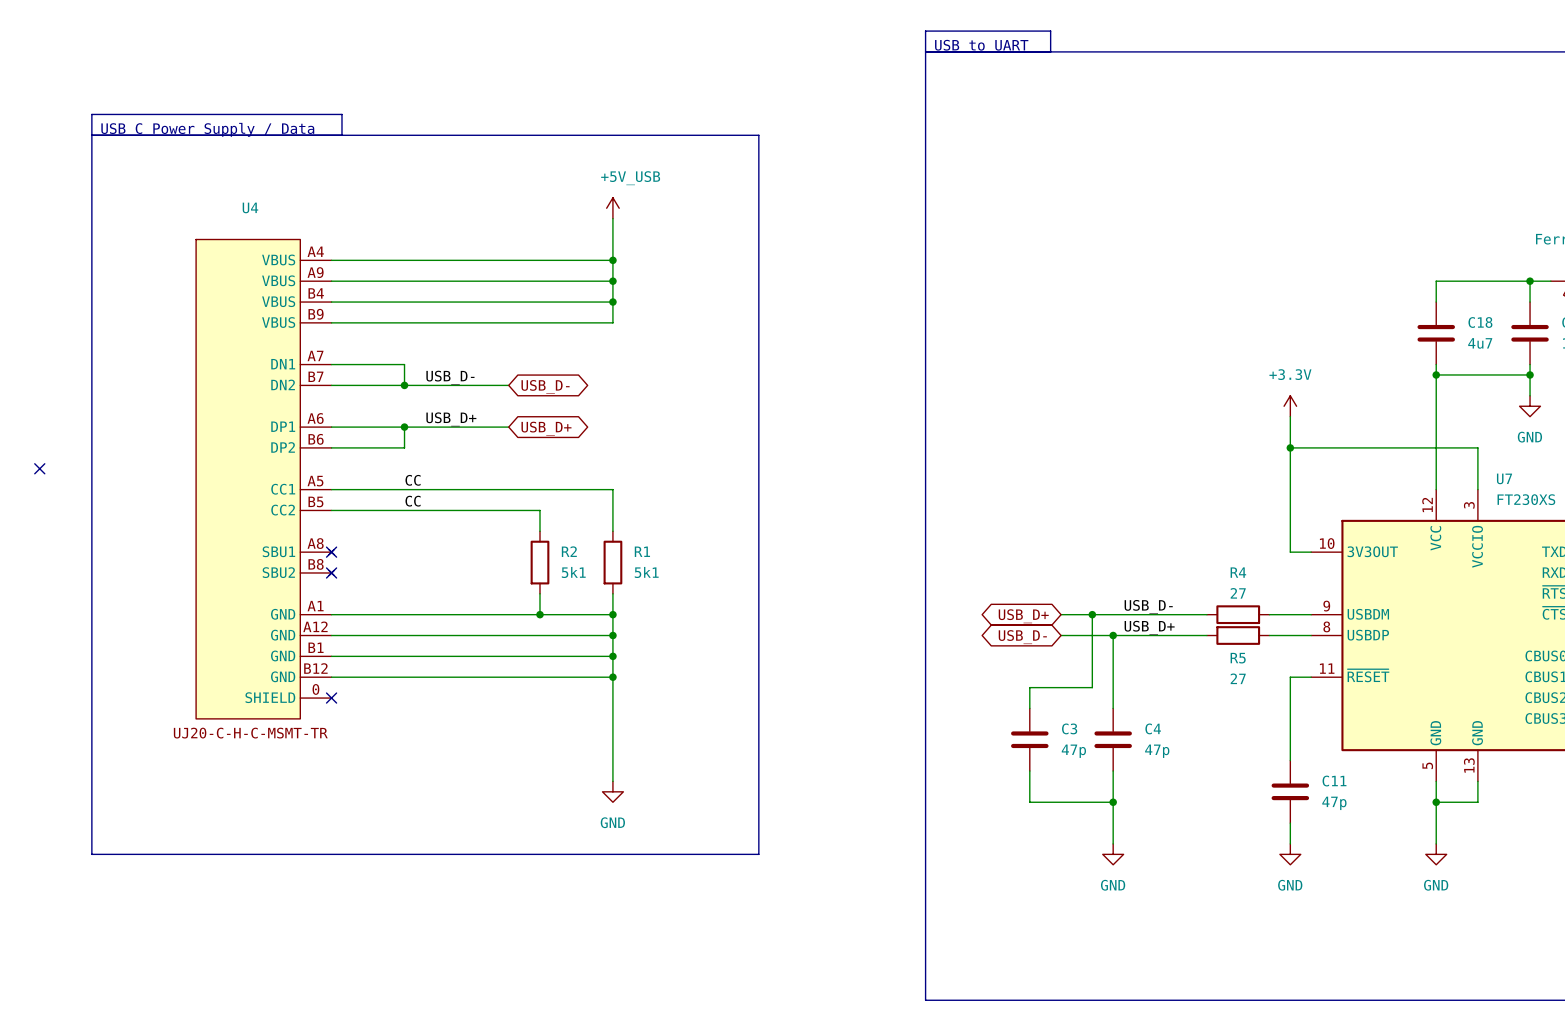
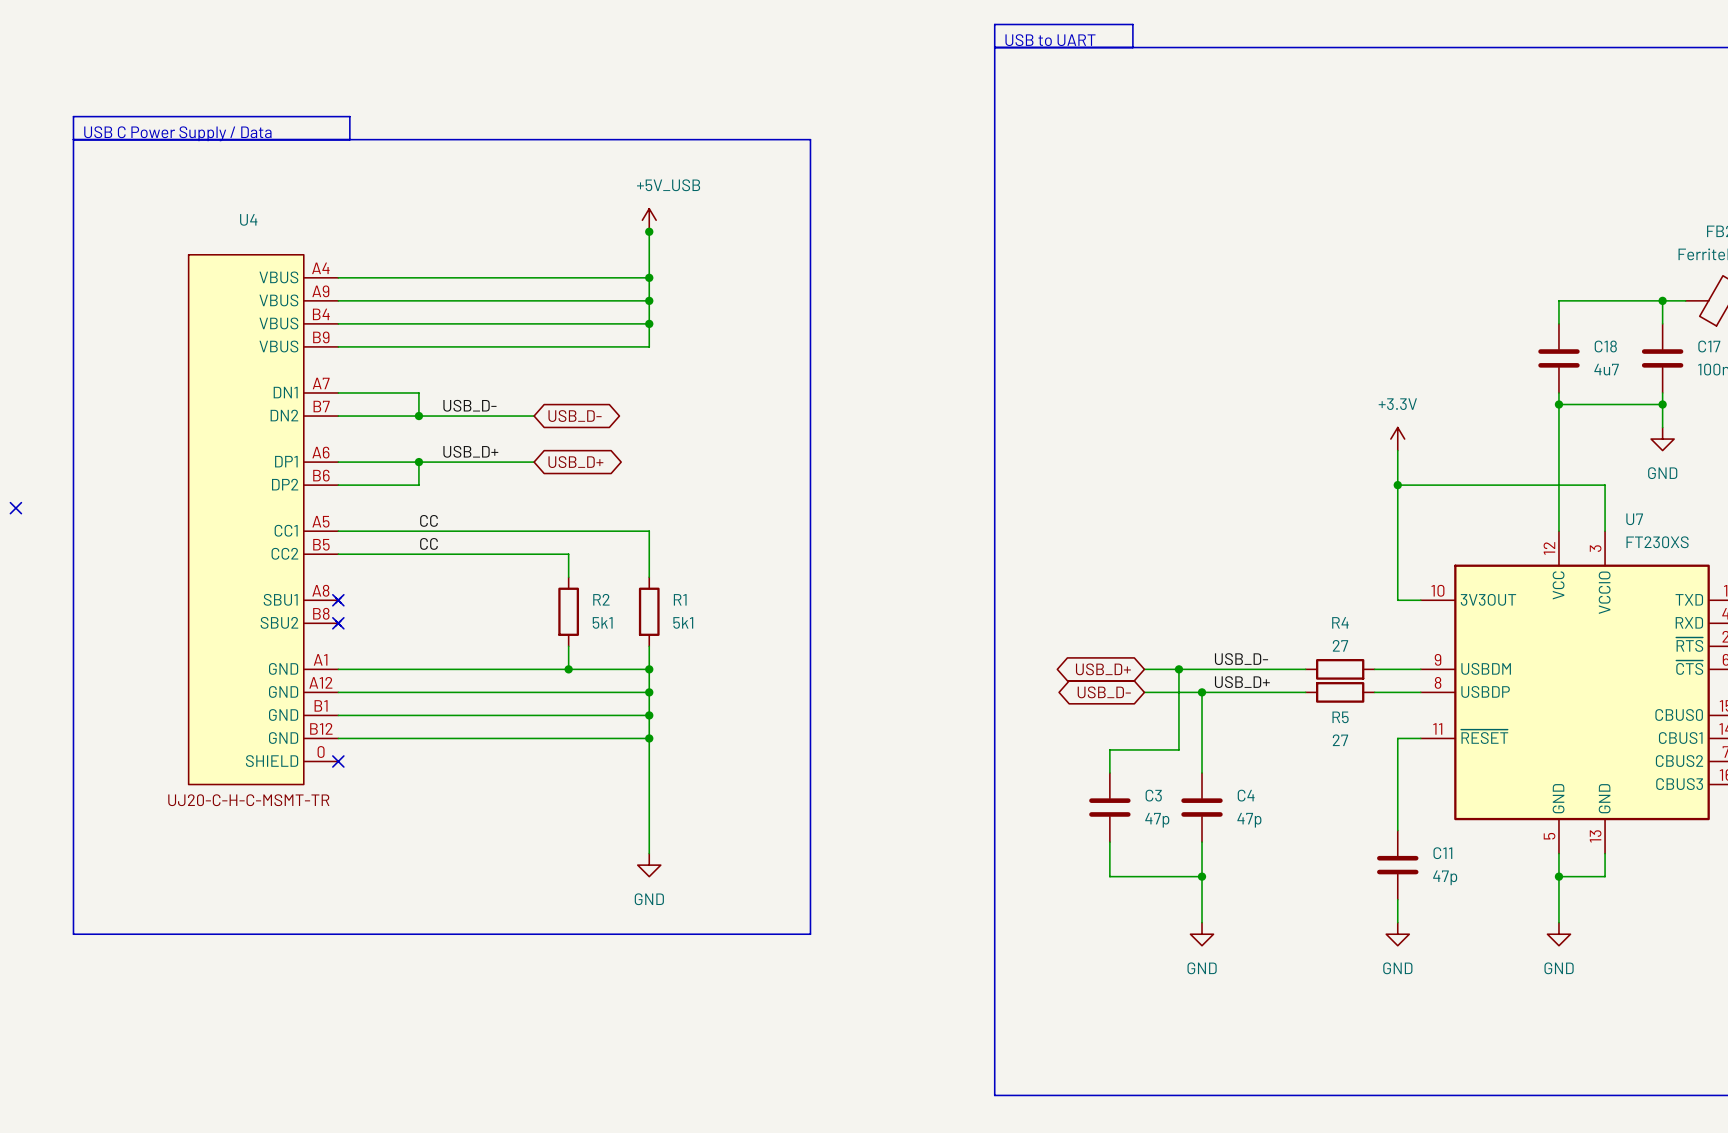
junction: none -> (649, 231)

